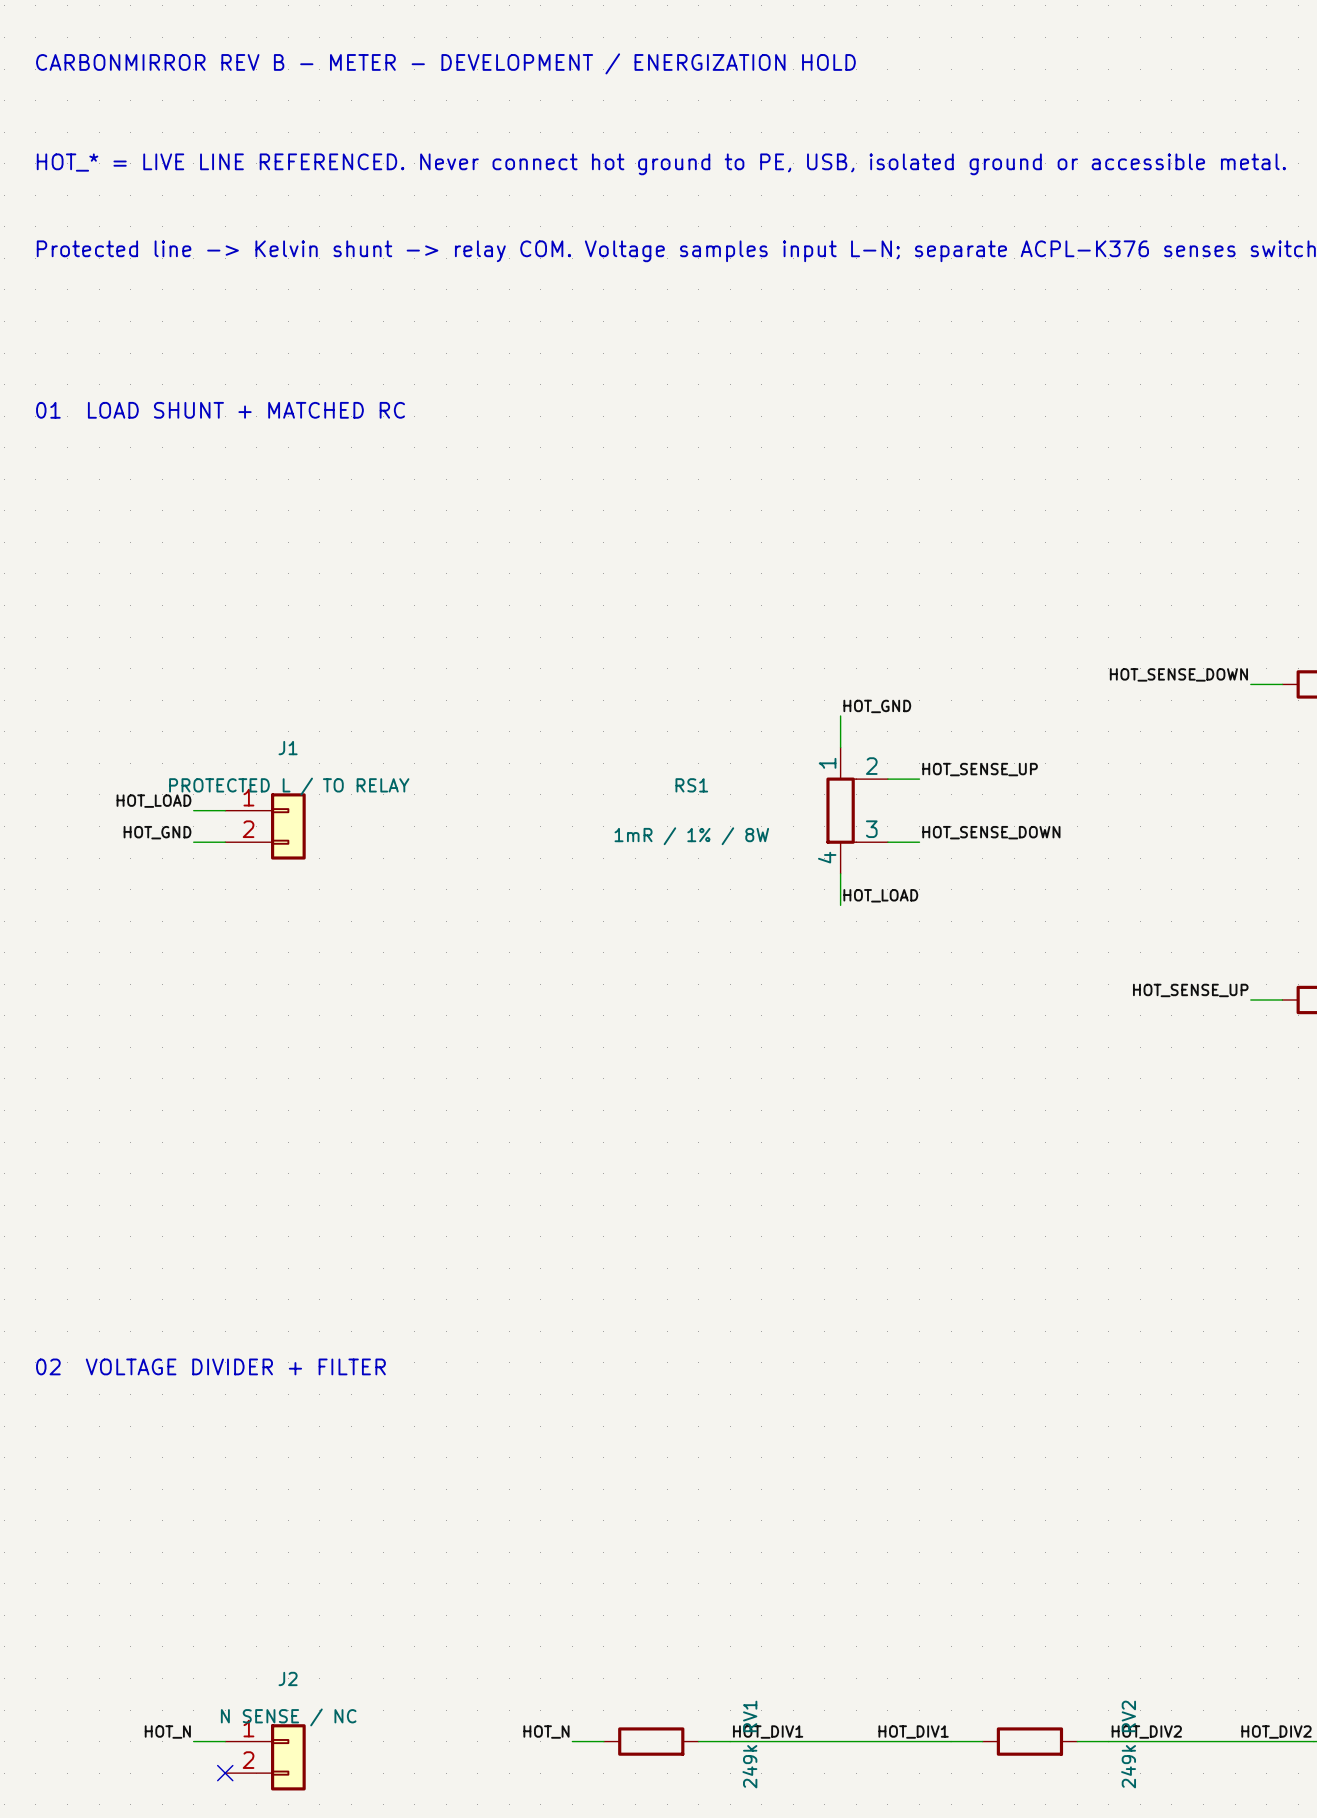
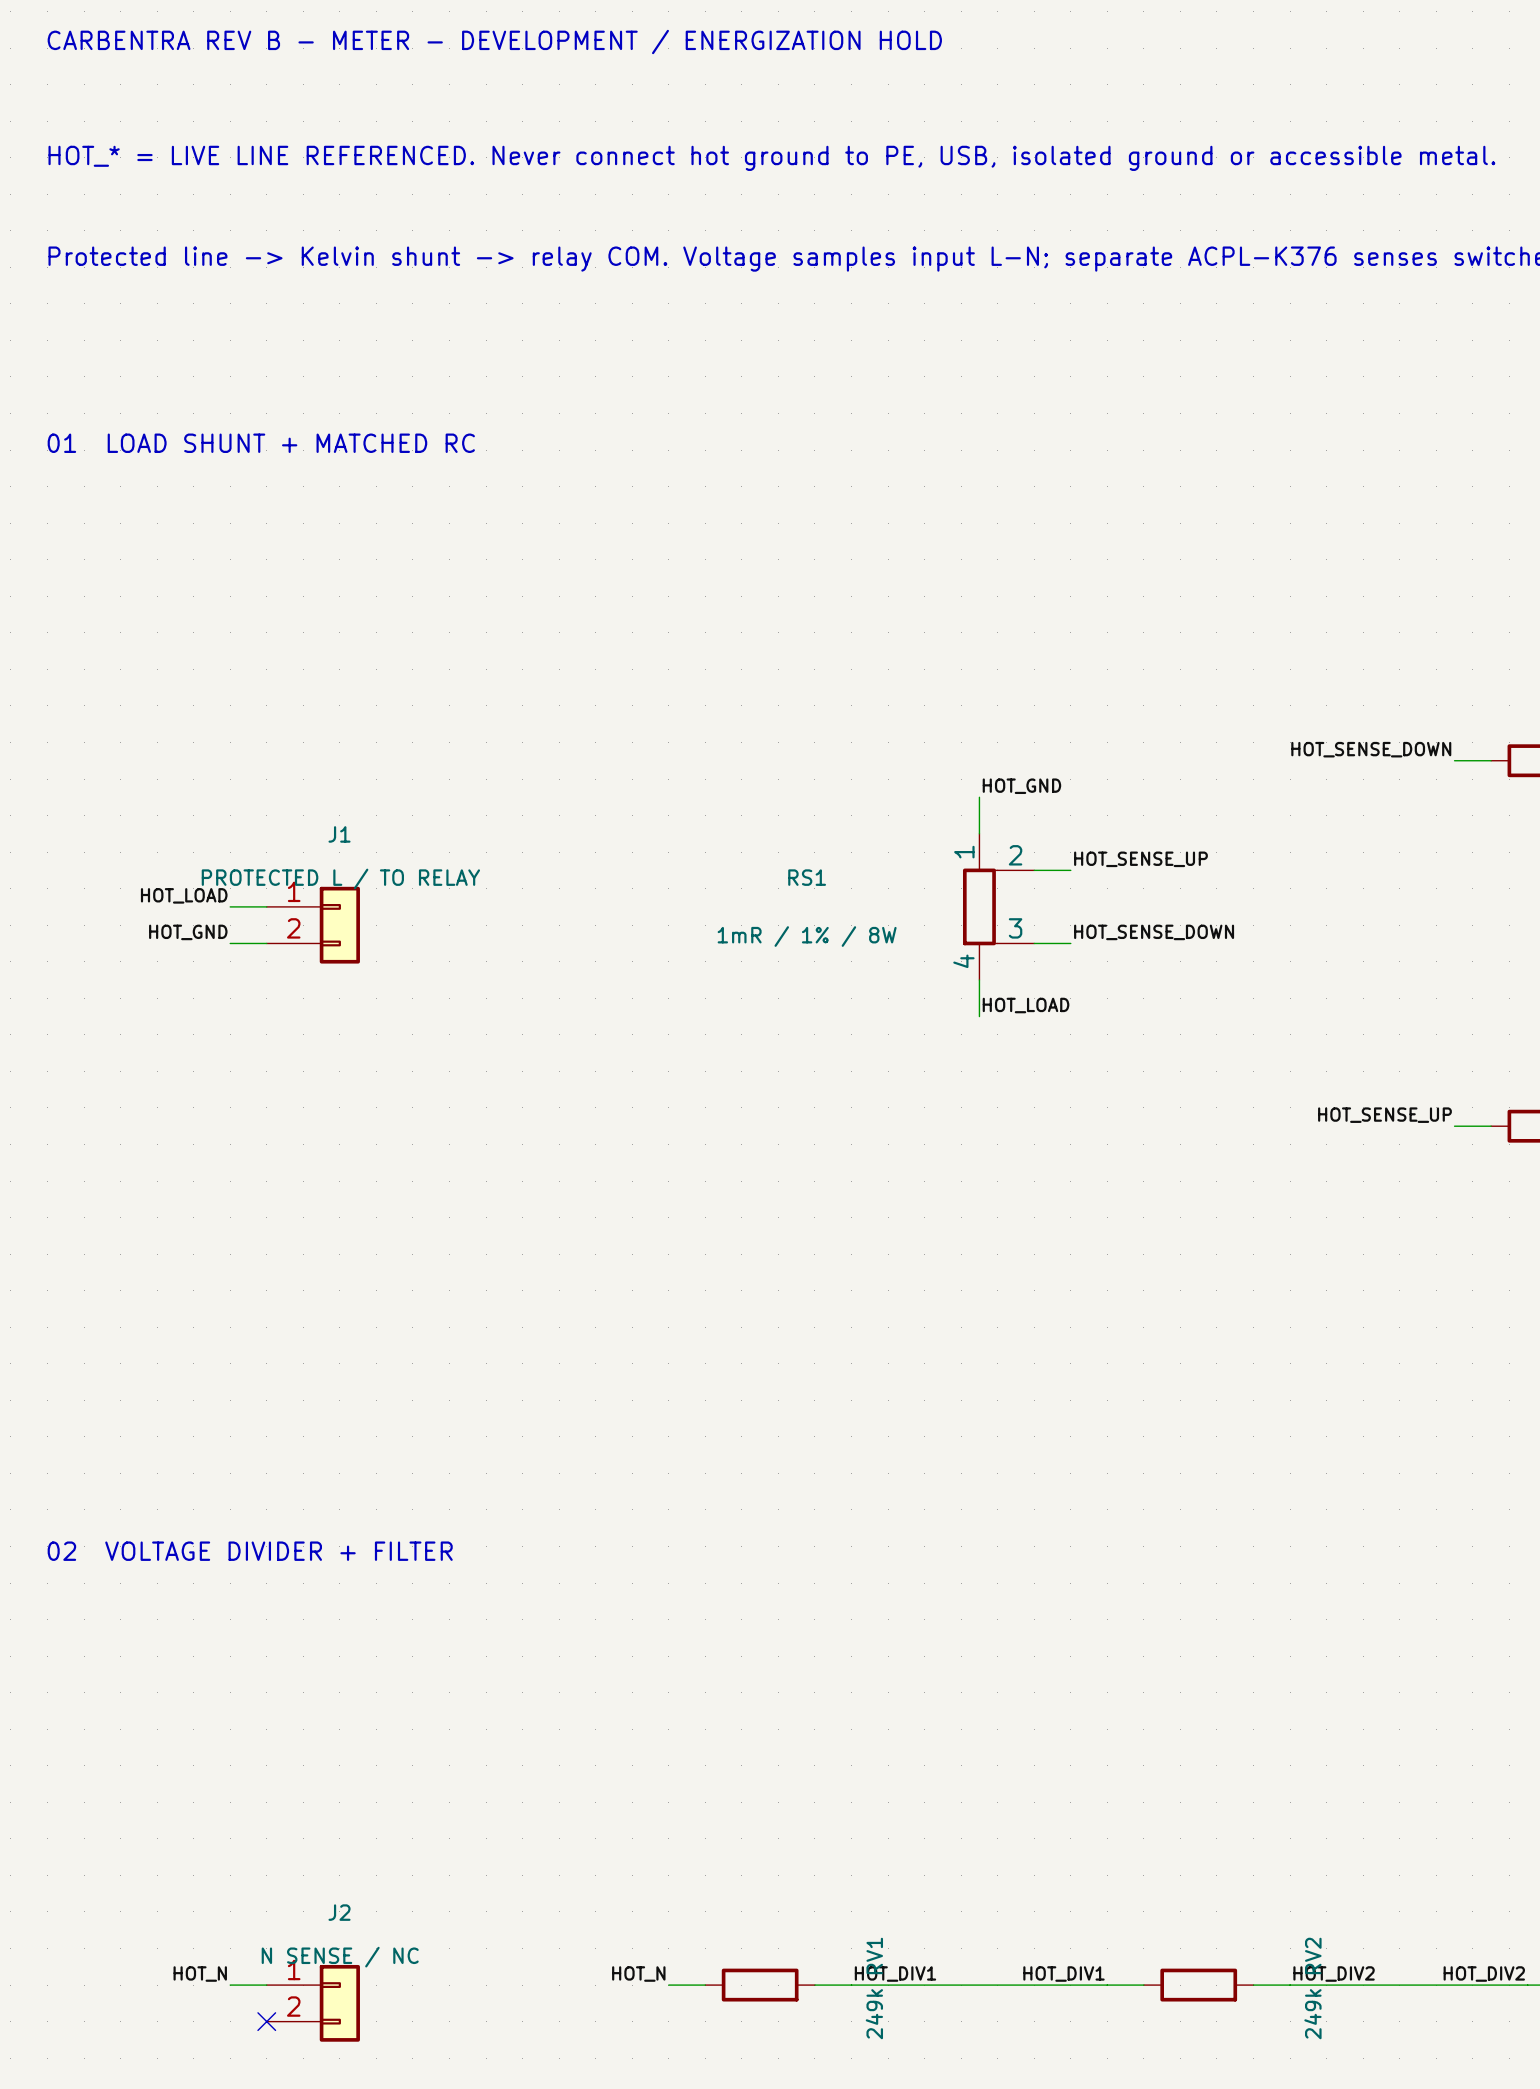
text: CARBONMIRROR REV B - METER - DEVELOPMENT / ENERGIZATION HOLD (445, 63) -> CARBENTRA REV B - METER - DEVELOPMENT / ENERGIZATION HOLD (494, 42)

